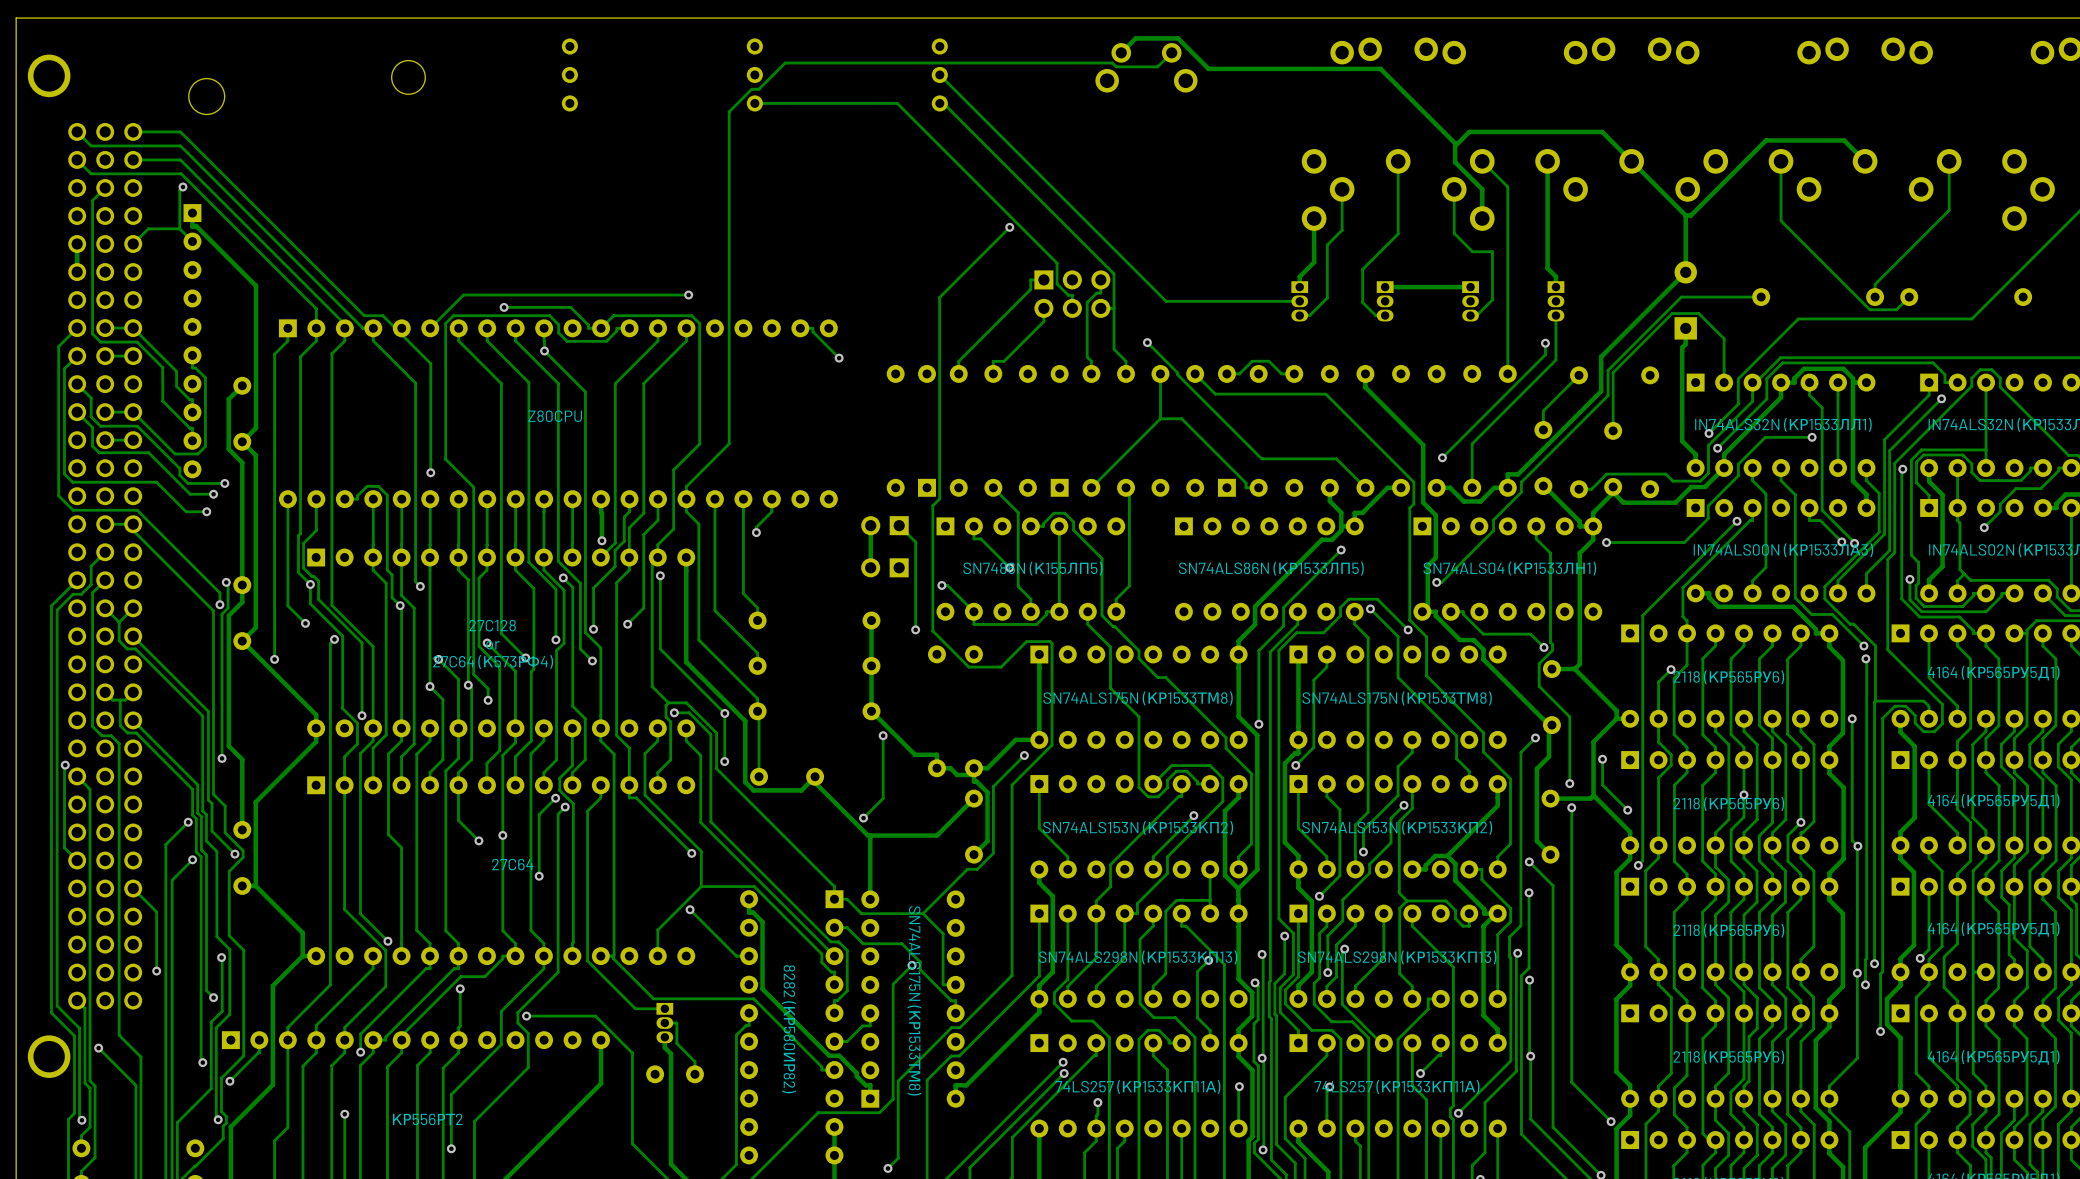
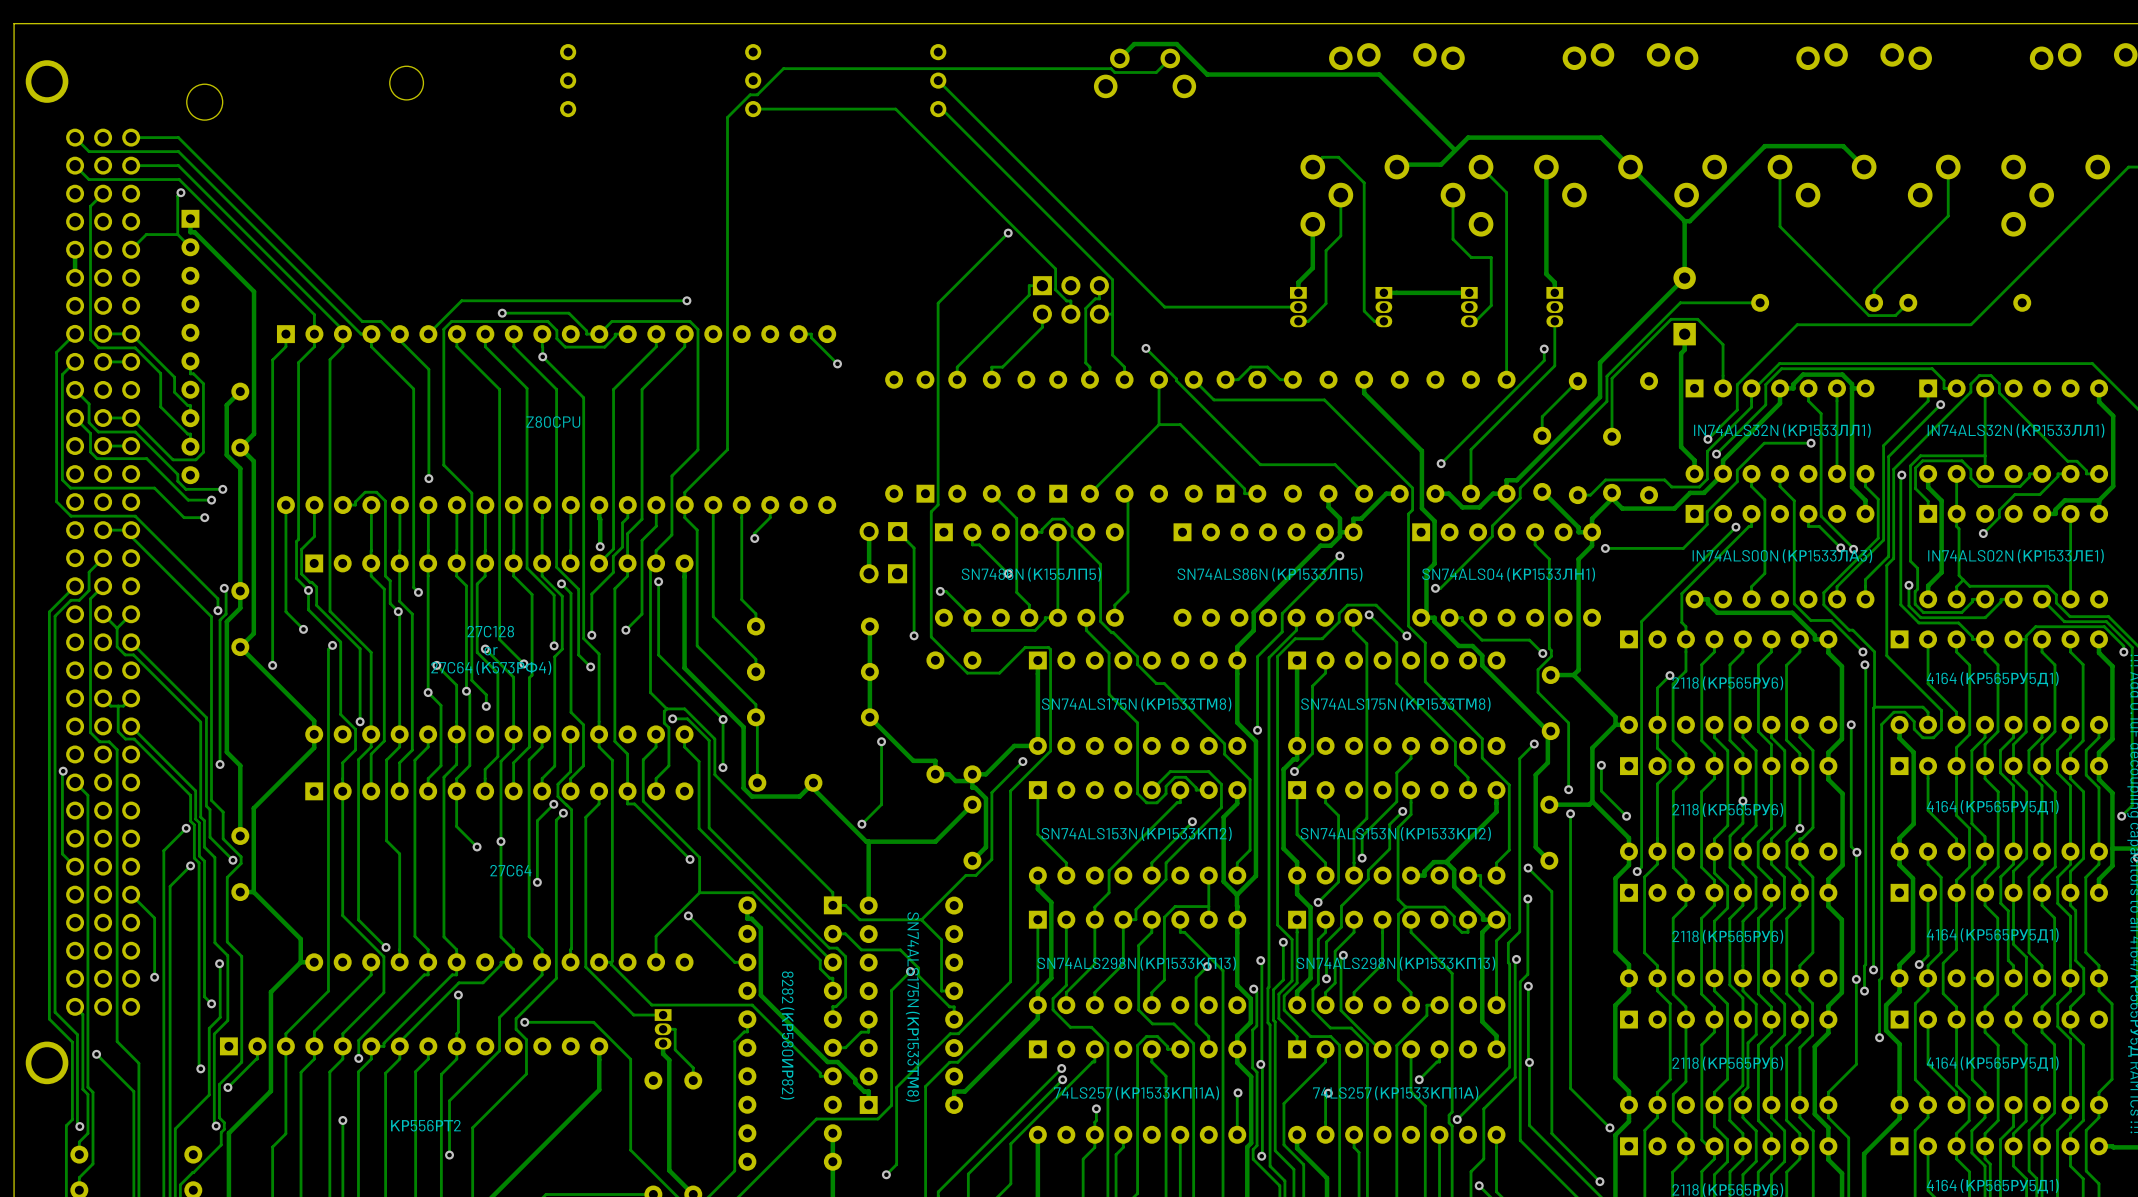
track: (1455, 143) (1455, 162) (1482, 189) (1482, 218) -> none
track: none -> (1453, 151) (1441, 164) (1402, 164) (1401, 162)
track: (1398, 161) (1398, 233) (1362, 269) (1362, 302) (1365, 305) -> (1312, 167) (1322, 157) (1338, 157) (1364, 182) (1364, 311)

